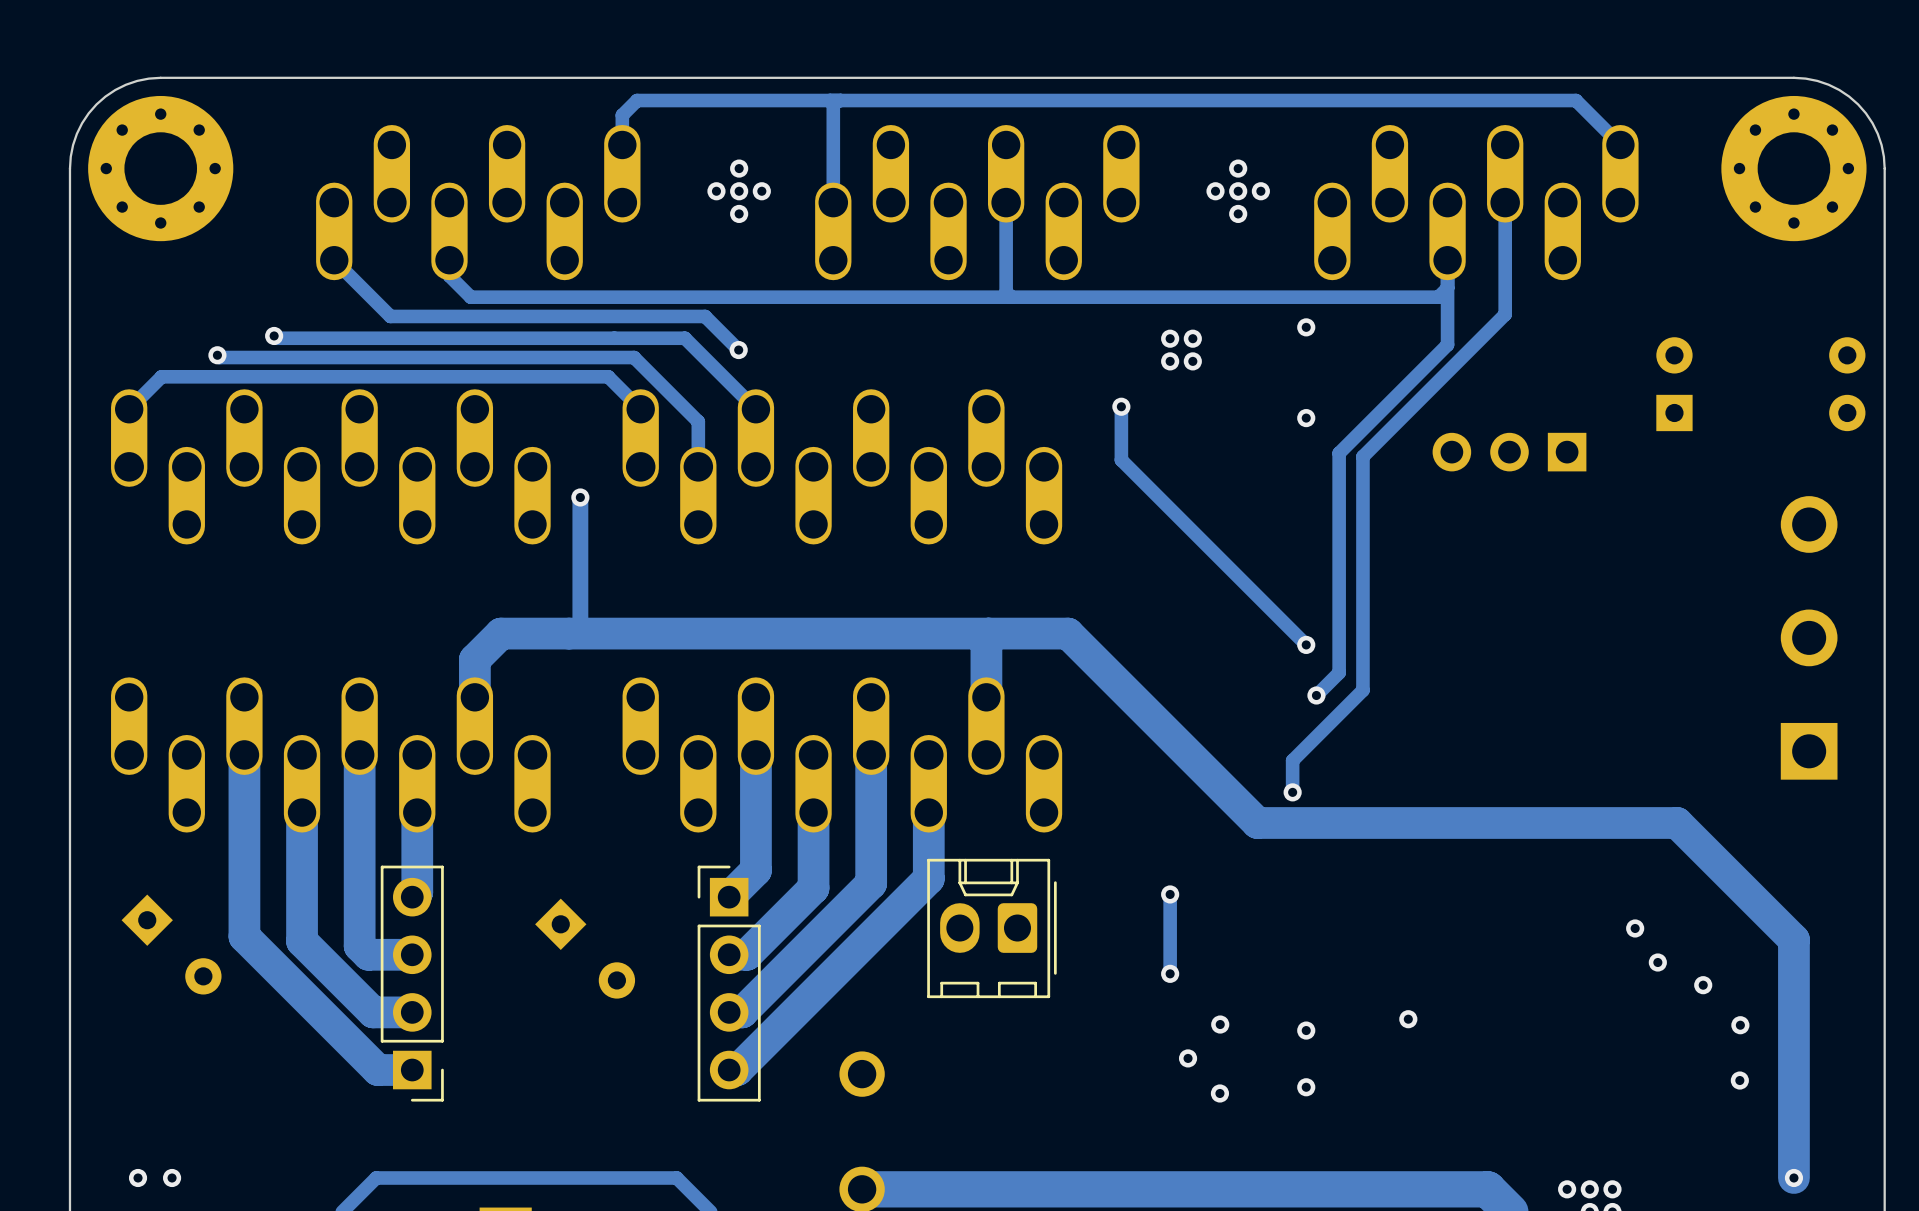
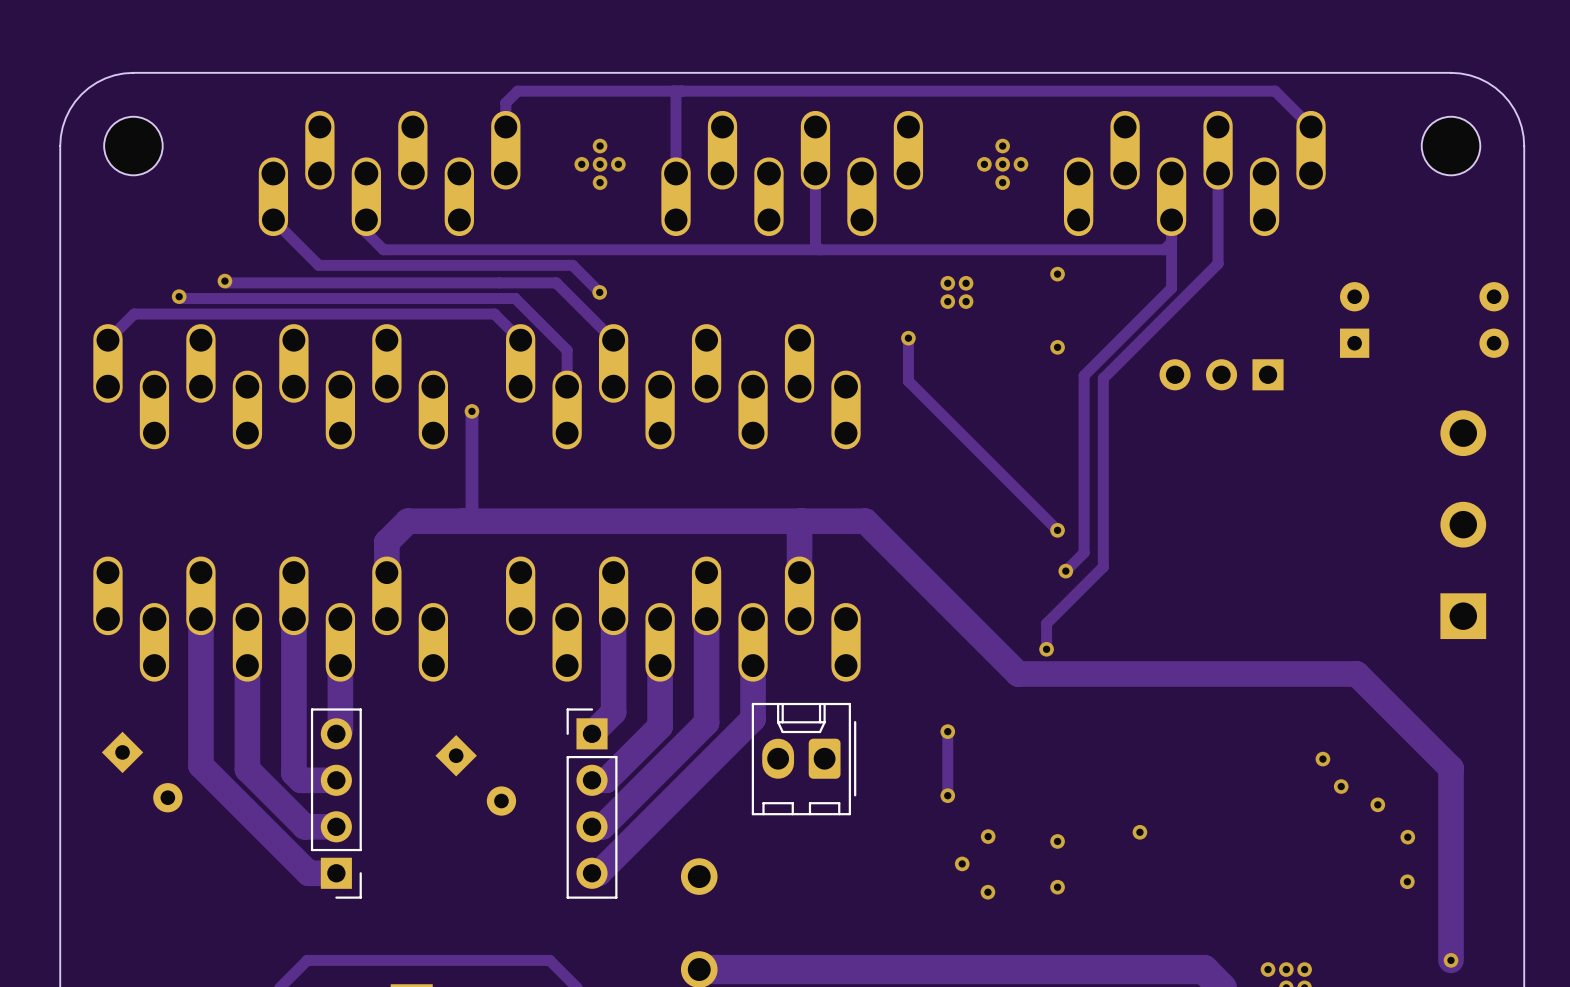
part footprint: [88, 95, 234, 242] -> [104, 116, 163, 176]
part footprint: [1721, 95, 1867, 242] -> [1421, 116, 1481, 176]
via: (138, 1177) -> none
via: (172, 1177) -> none

